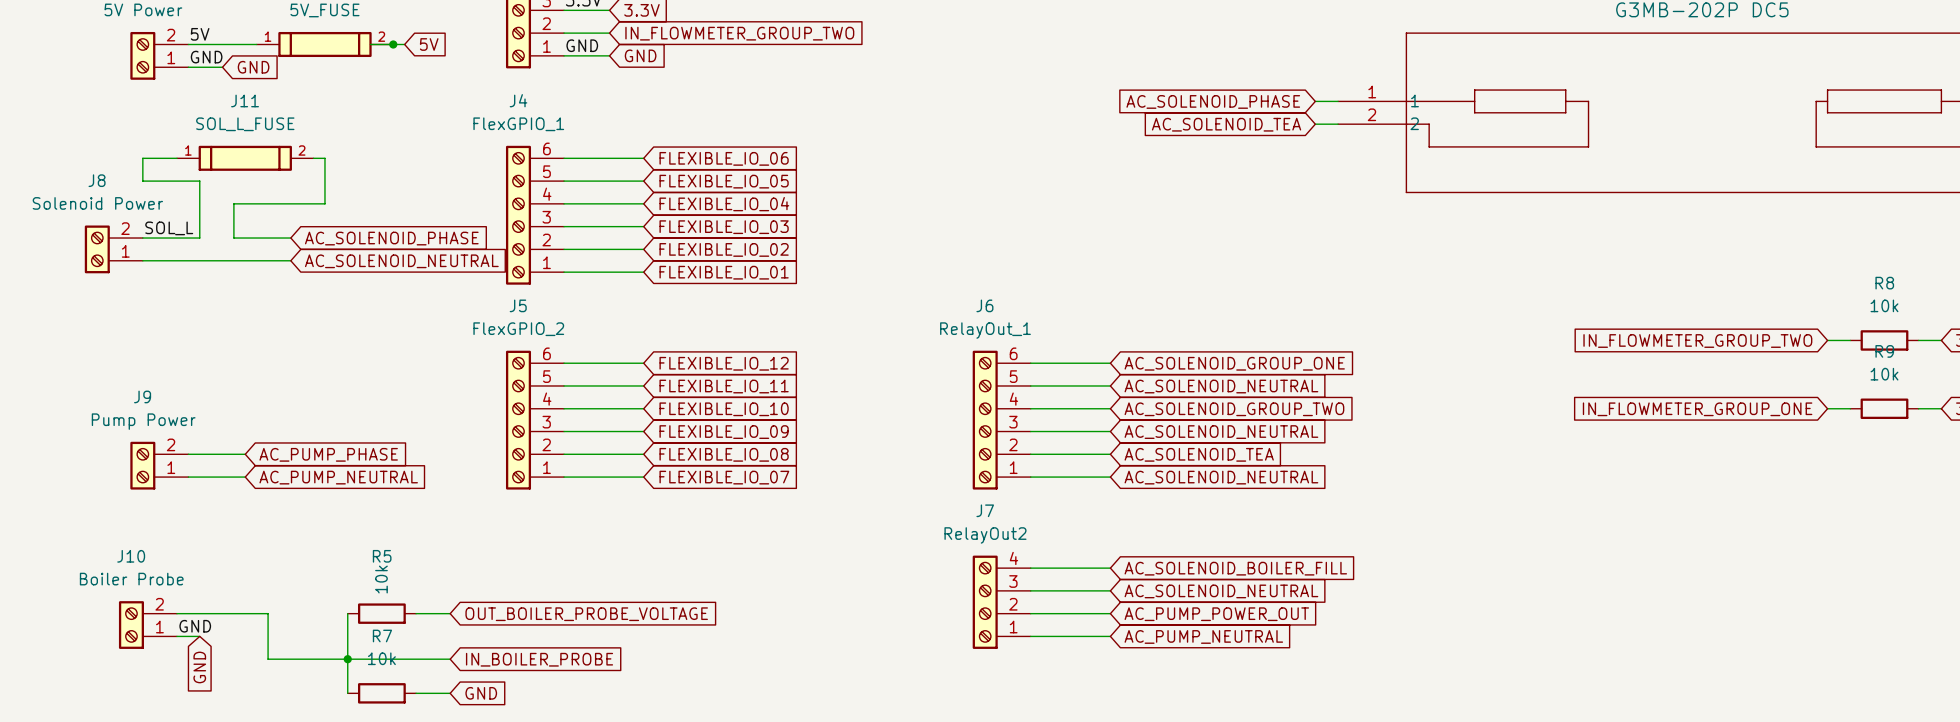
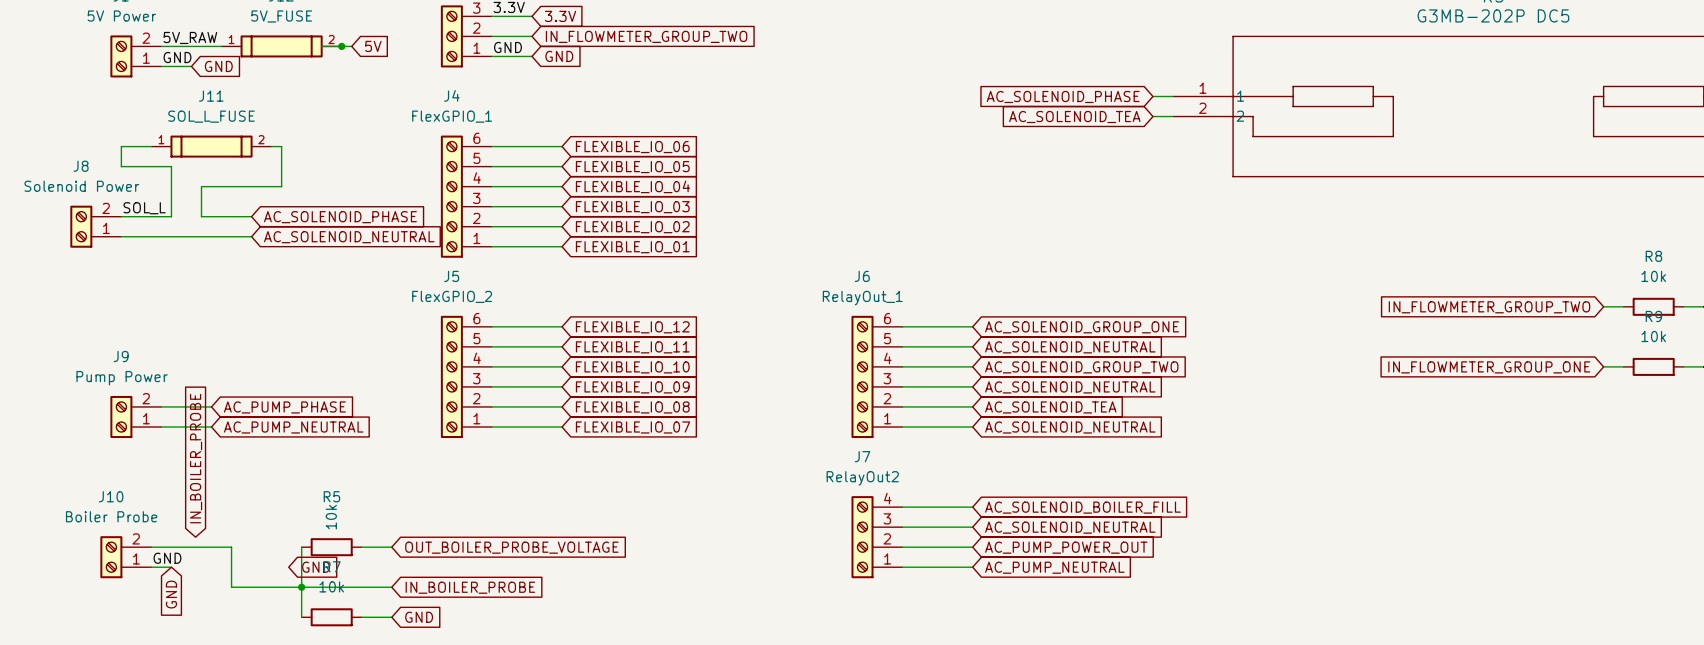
label: 5V (200, 34) -> 5V_RAW (190, 37)
global label: none -> IN_BOILER_PROBE (196, 458)
global label: none -> GND (316, 567)

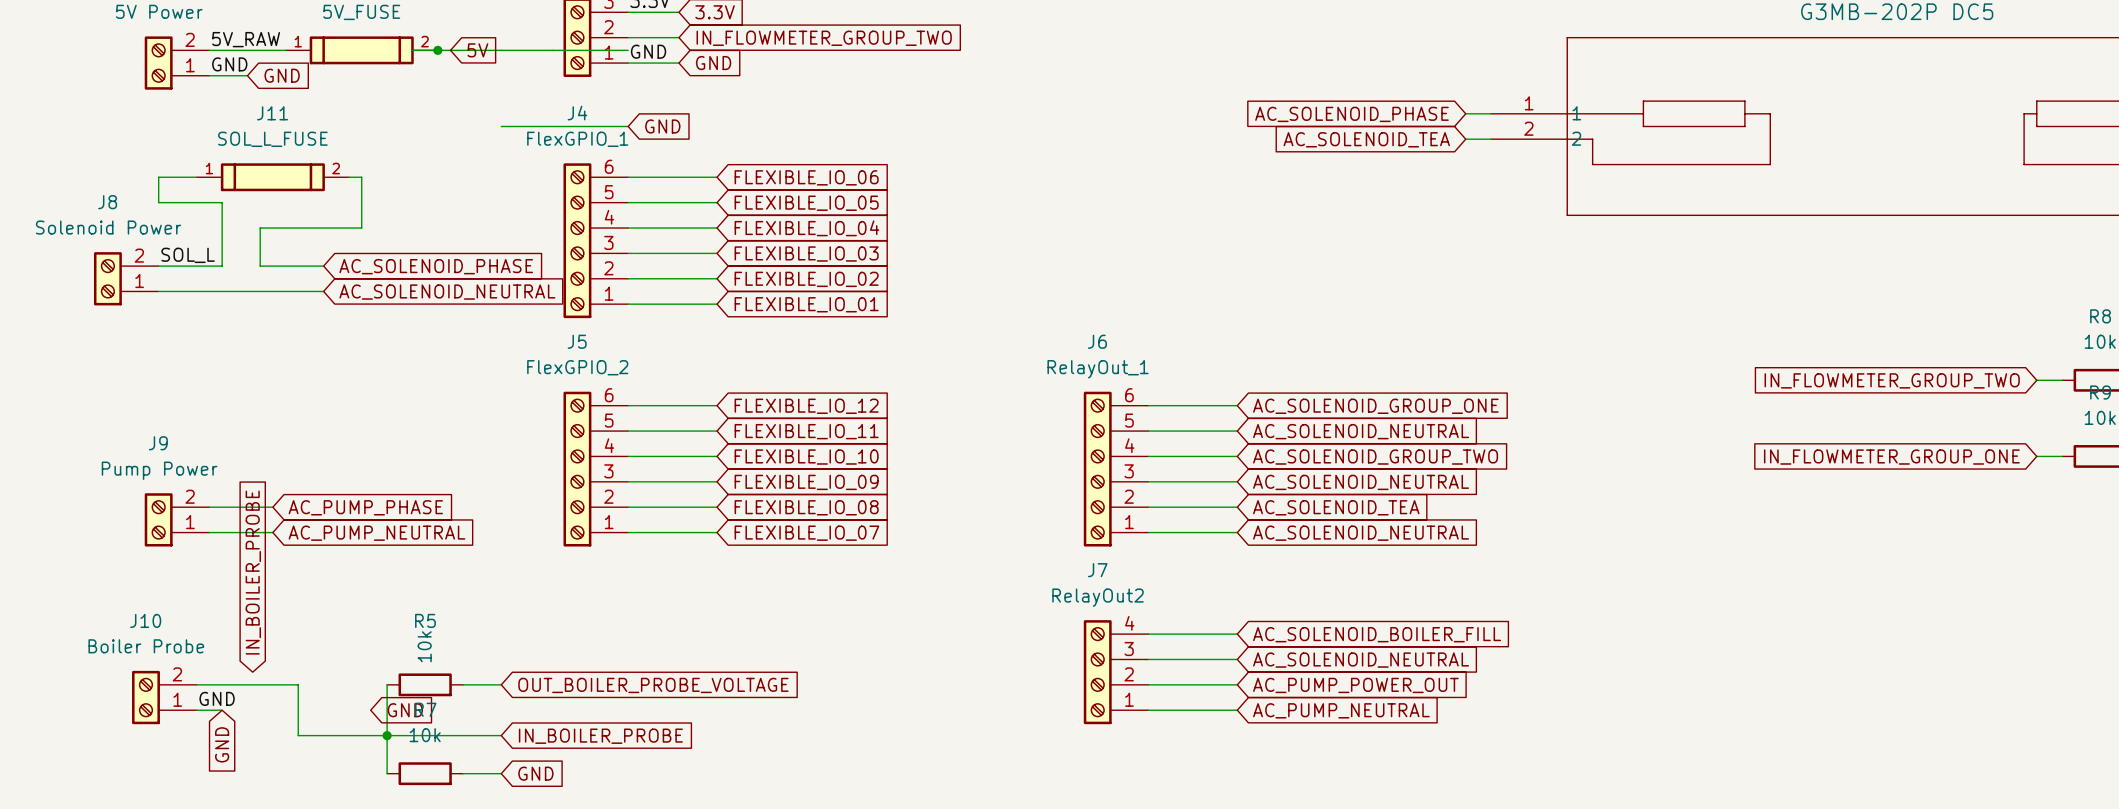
wire: none -> (450, 50) (628, 50)
wire: none -> (501, 126) (628, 126)
global label: none -> GND (662, 126)

